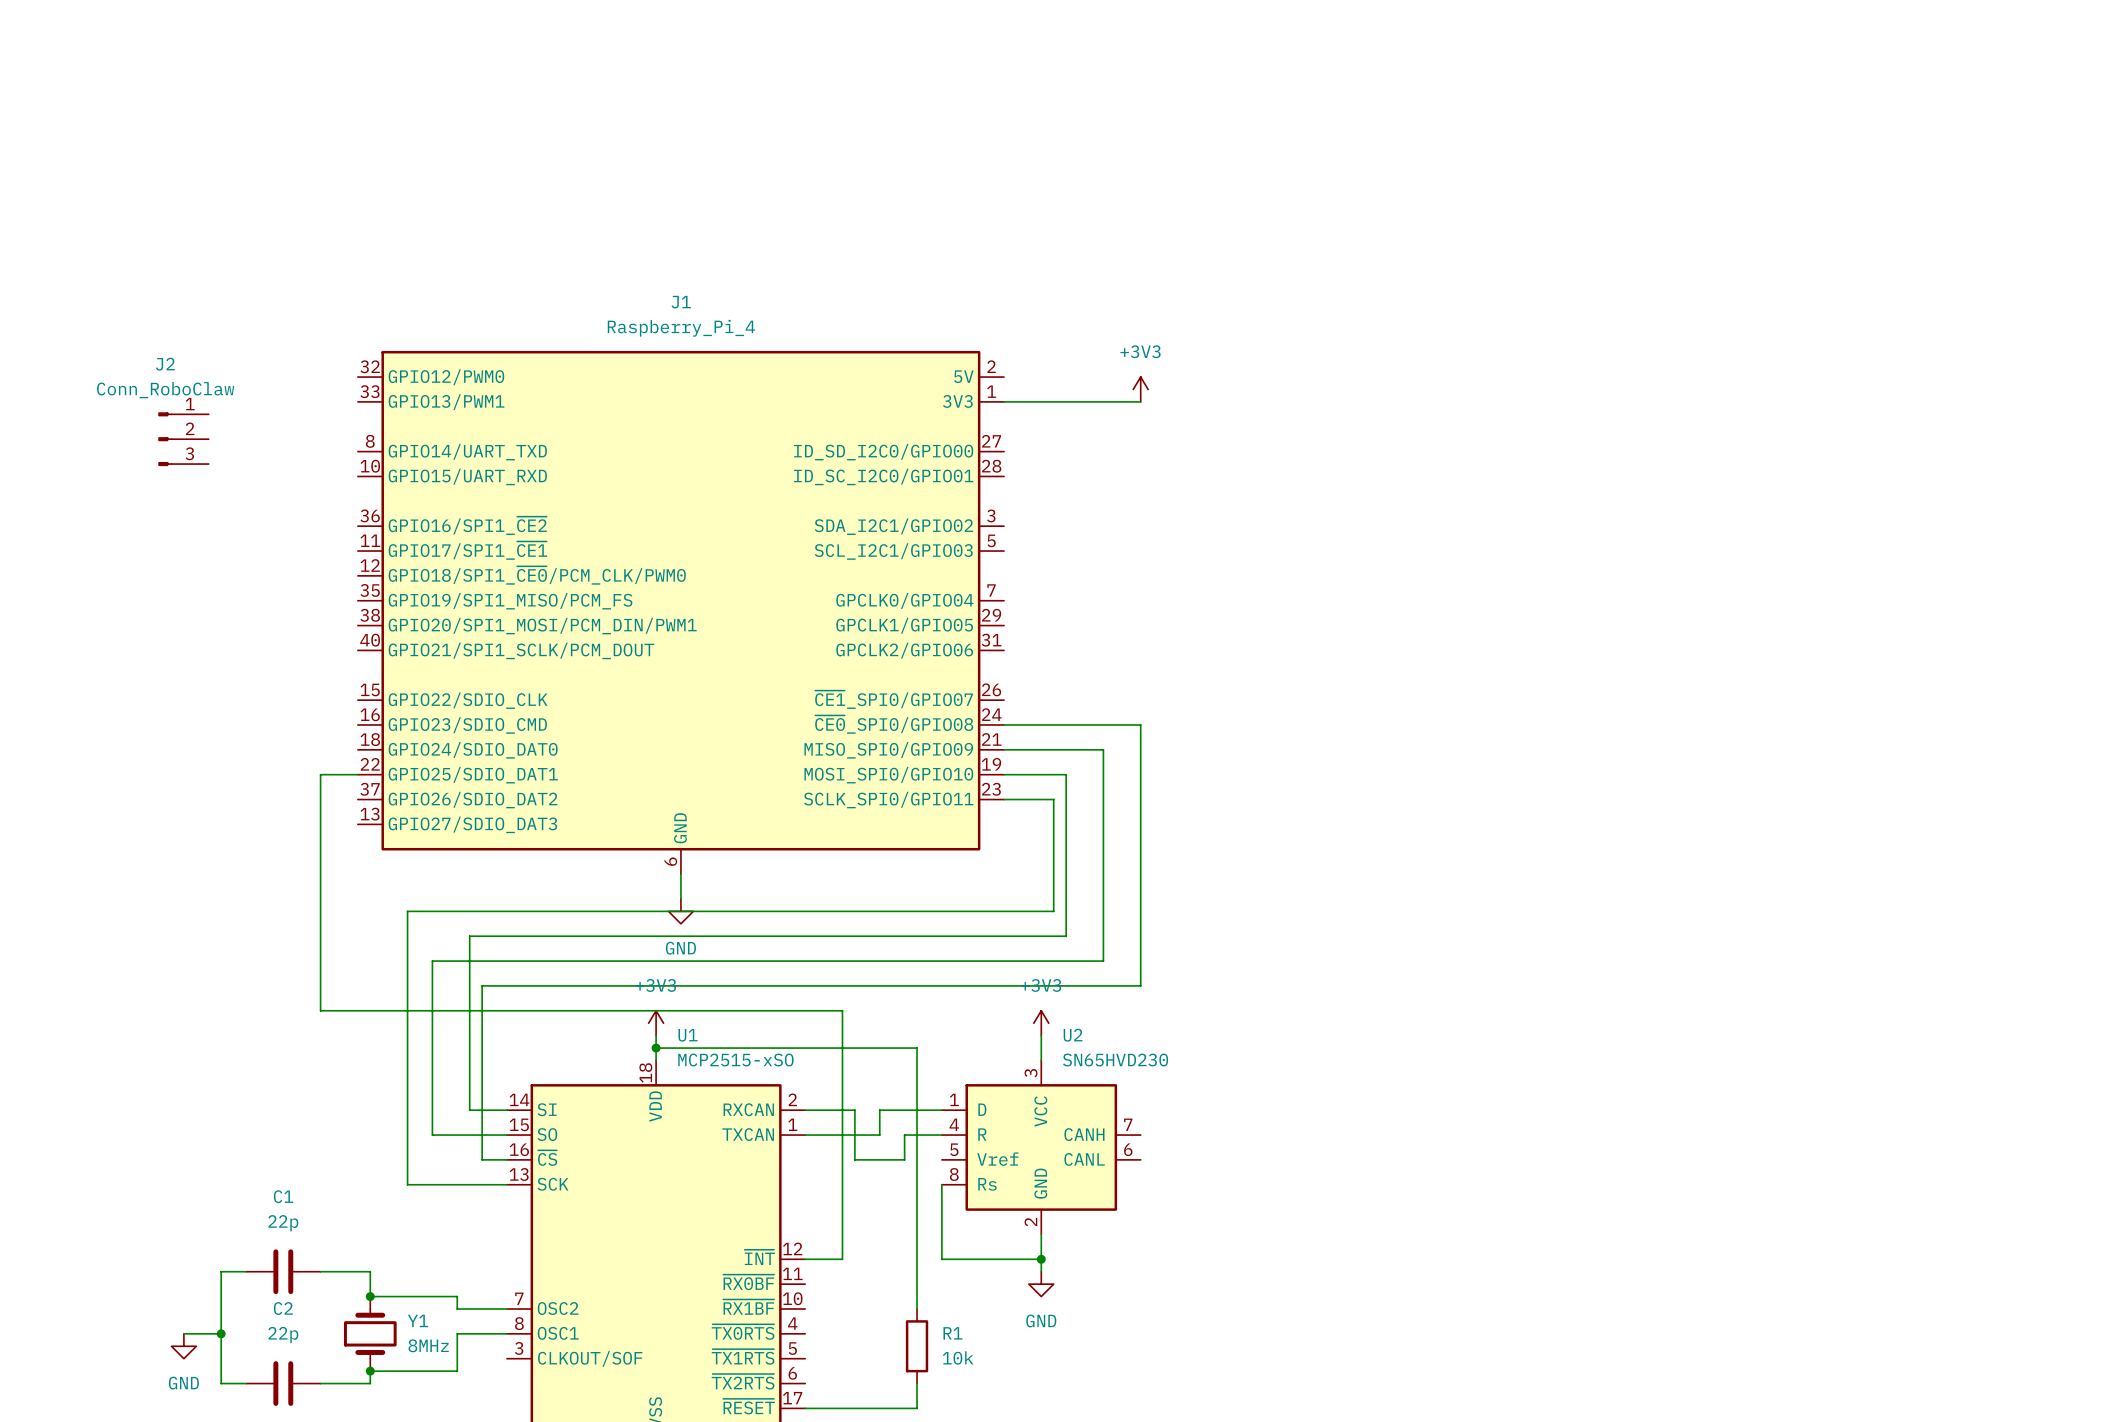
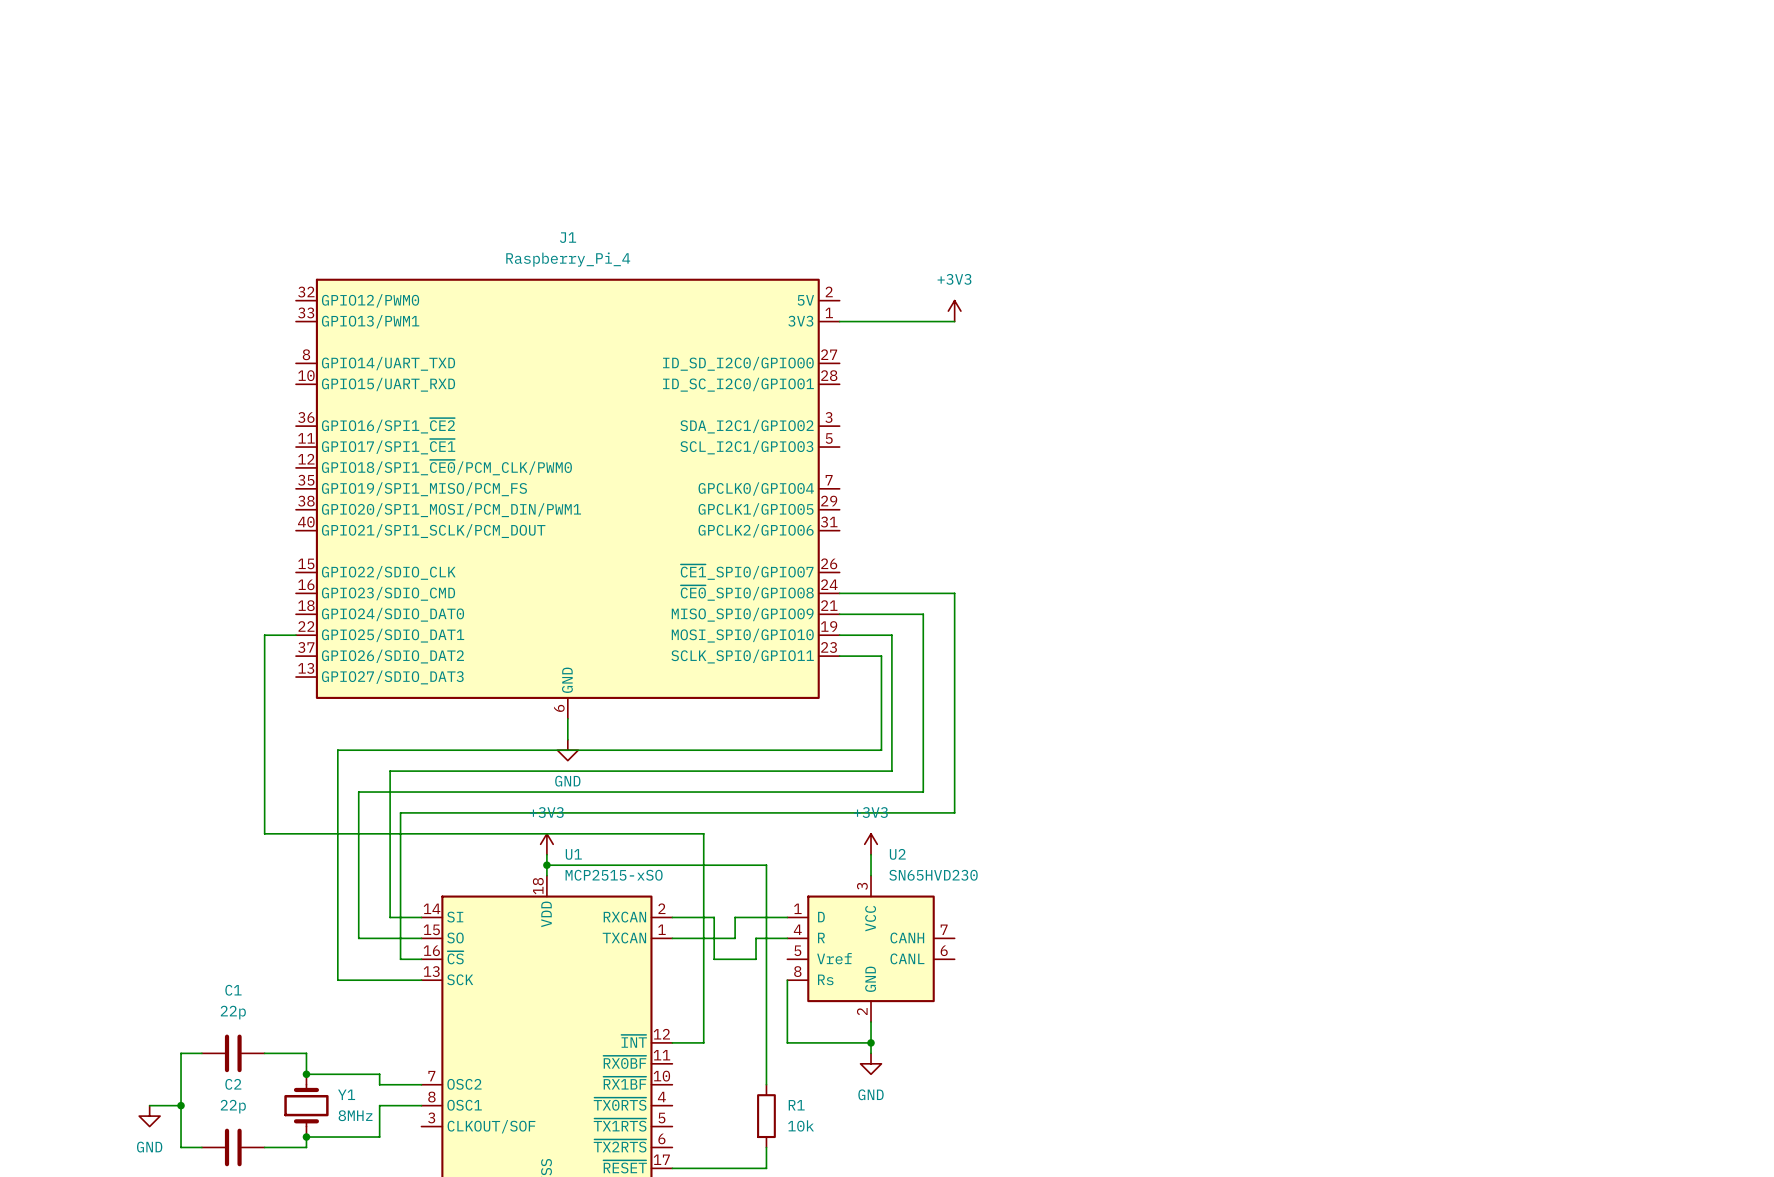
J2: Conn_RoboClaw (183, 439) -> none

